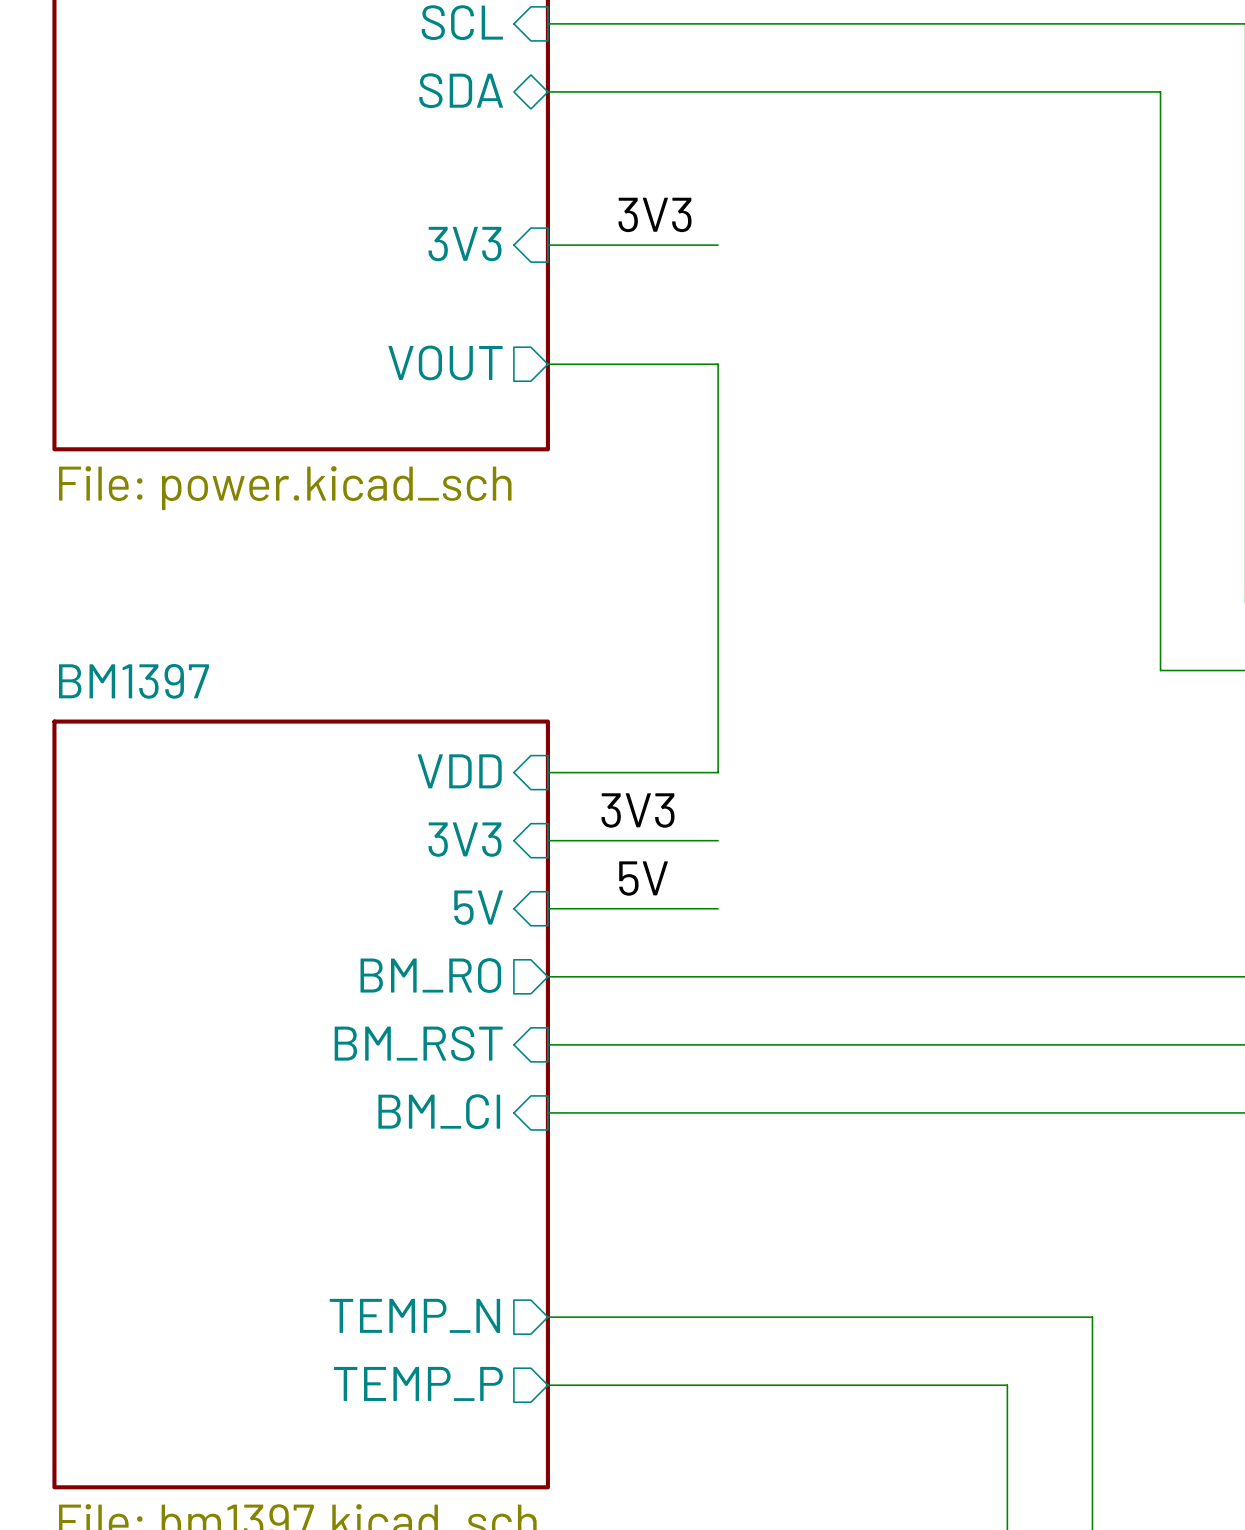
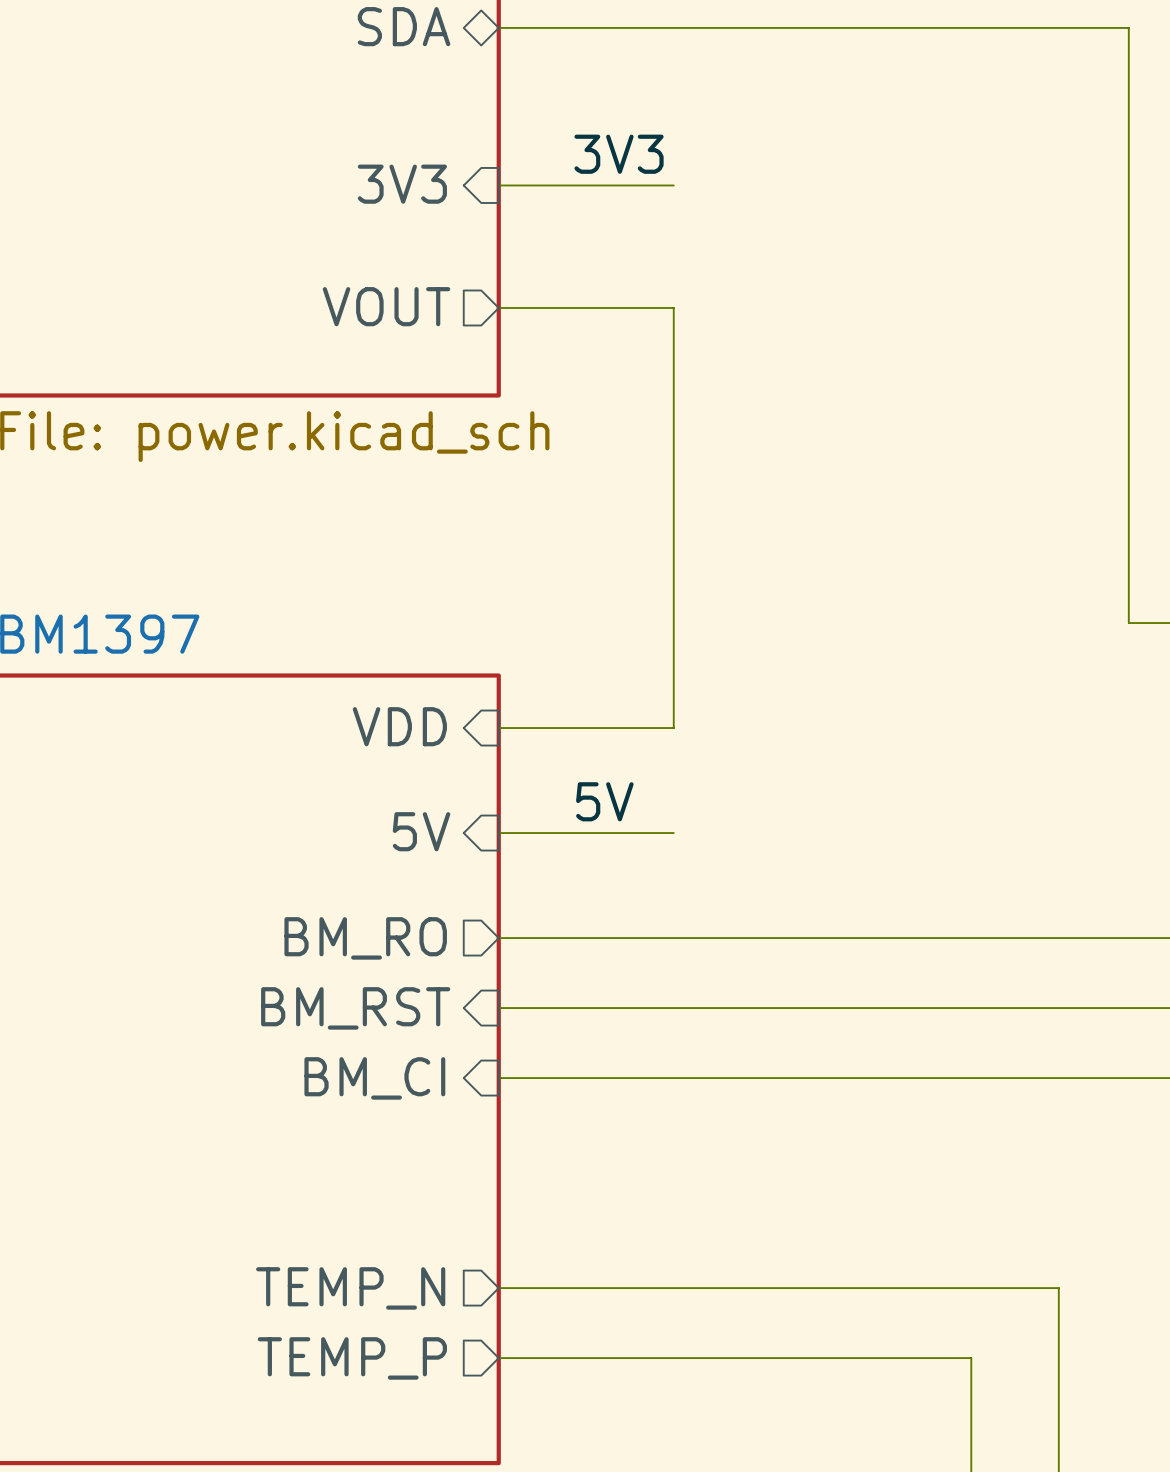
label: 3V3 (637, 810) -> none
sheet pin: 3V3 (464, 839) -> none
wire: (547, 840) (718, 840) -> (498, 833) (673, 833)
label position: 5V (643, 878) -> 5V (604, 801)
sheet pin position: 5V (478, 907) -> 5V (421, 831)
wire: (547, 908) (718, 908) -> none

